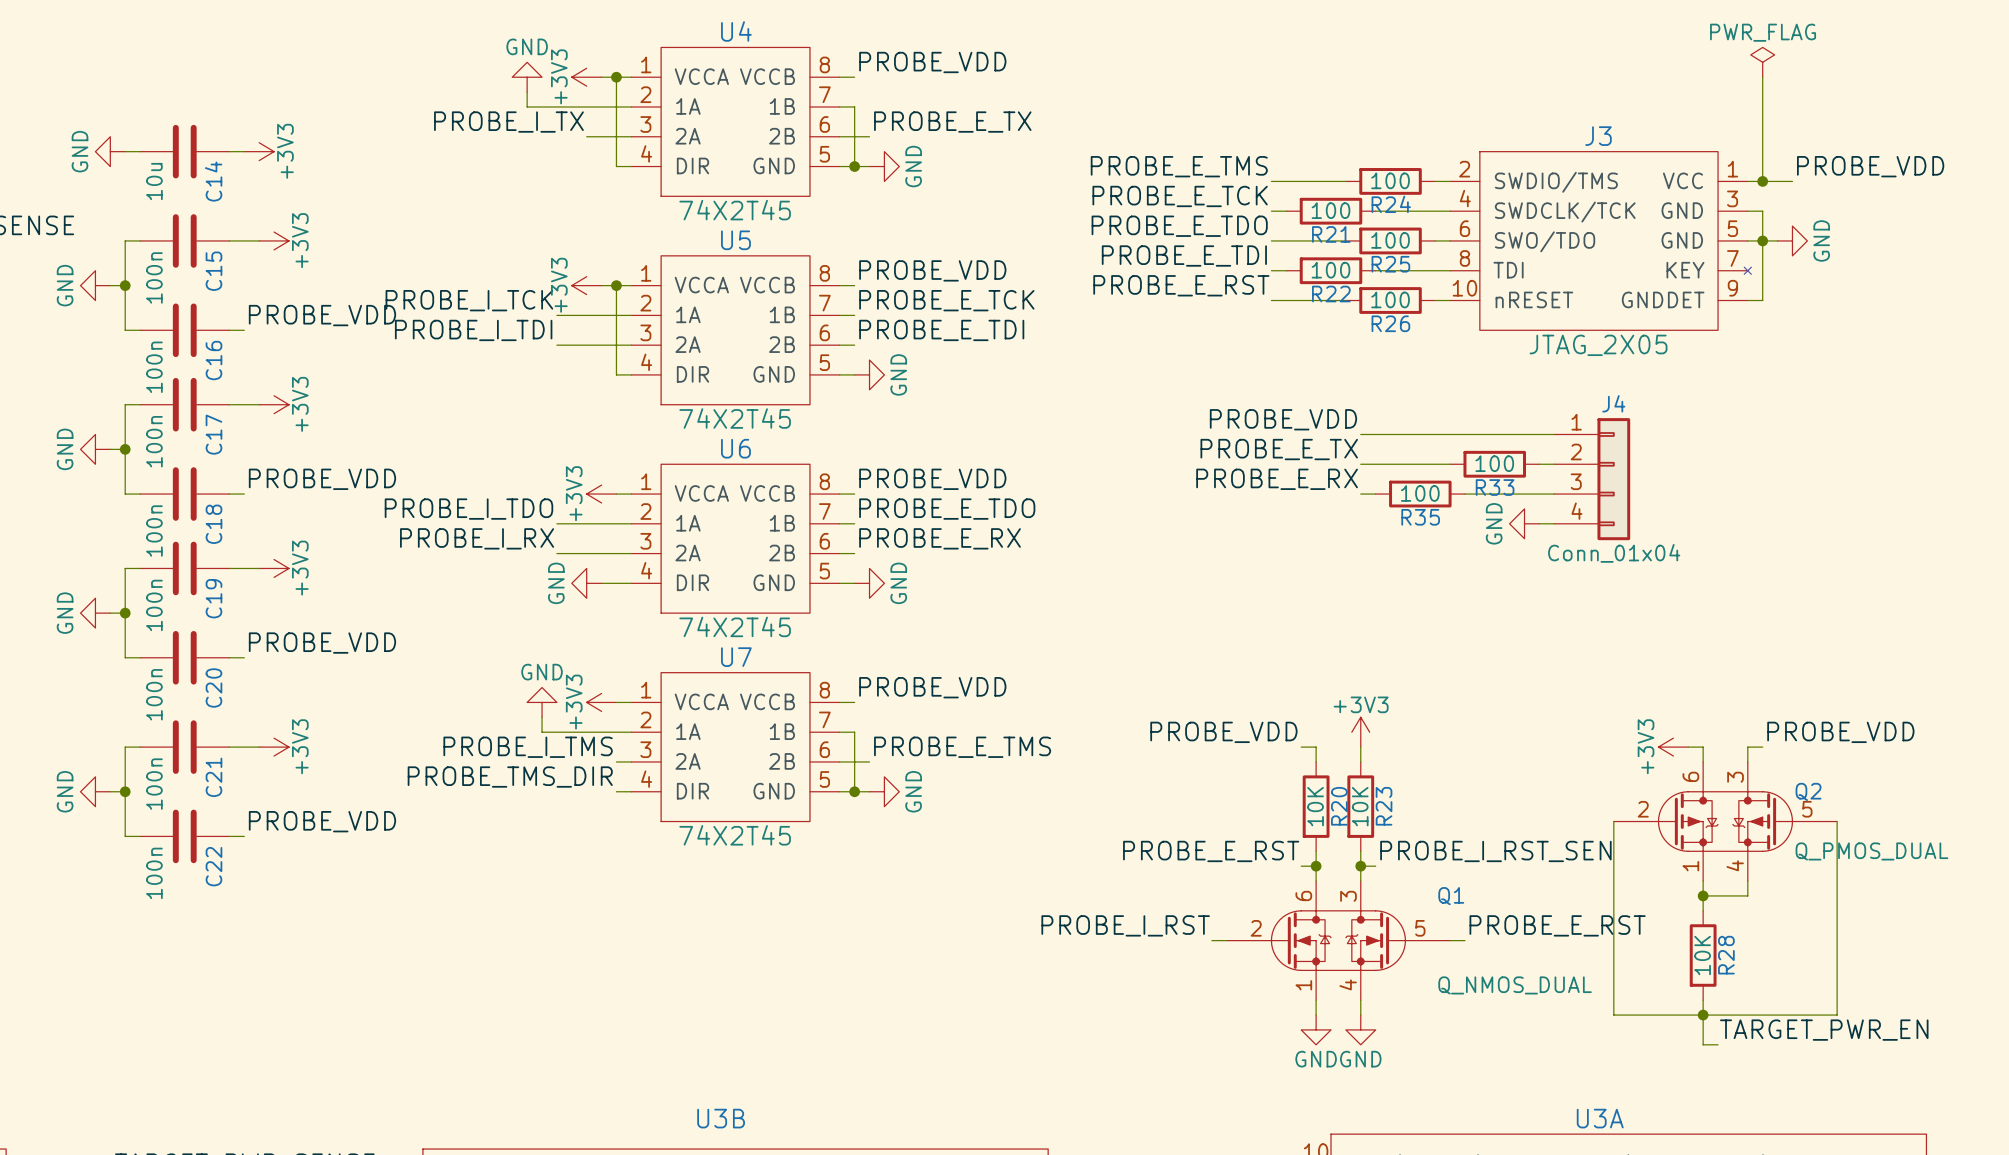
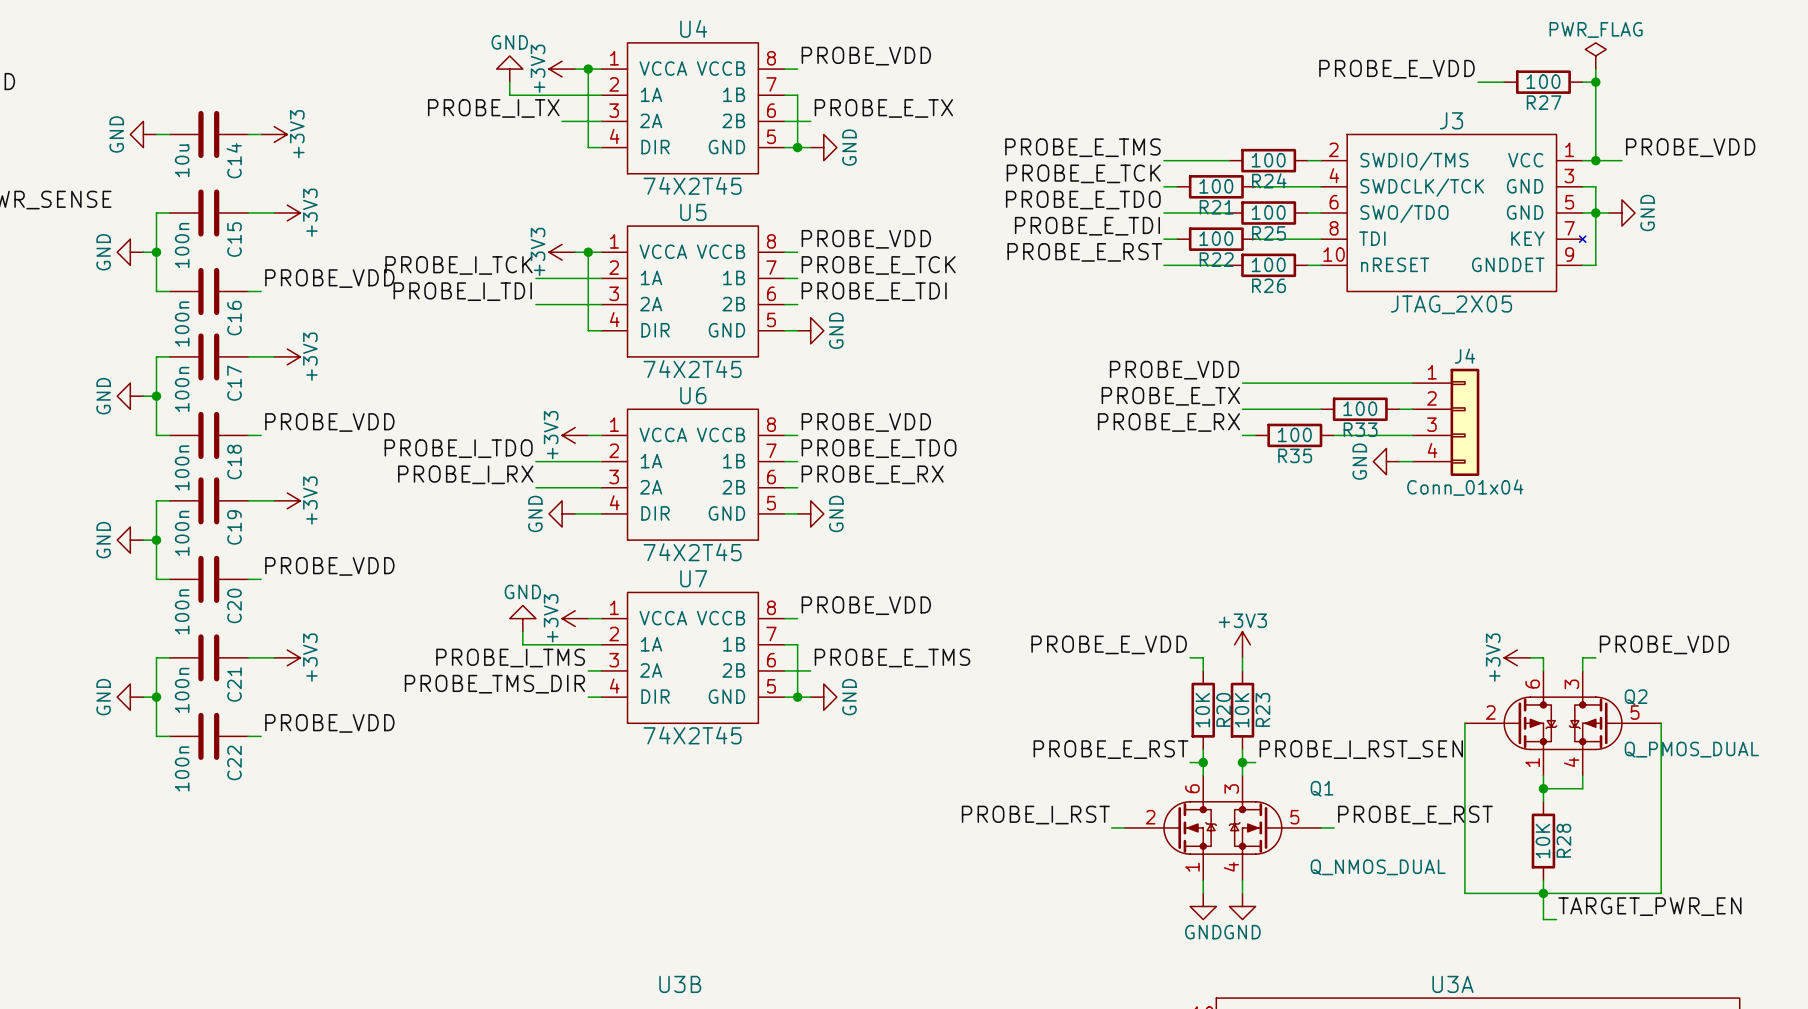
label: none -> PROBE_E_VDD (1396, 69)
wire: none -> (1478, 82) (1504, 82)
R27: none -> 100 (1543, 82)
wire: none -> (1582, 82) (1595, 82)
junction: none -> (1595, 82)
label: PROBE_VDD (1223, 732) -> PROBE_E_VDD (1109, 644)

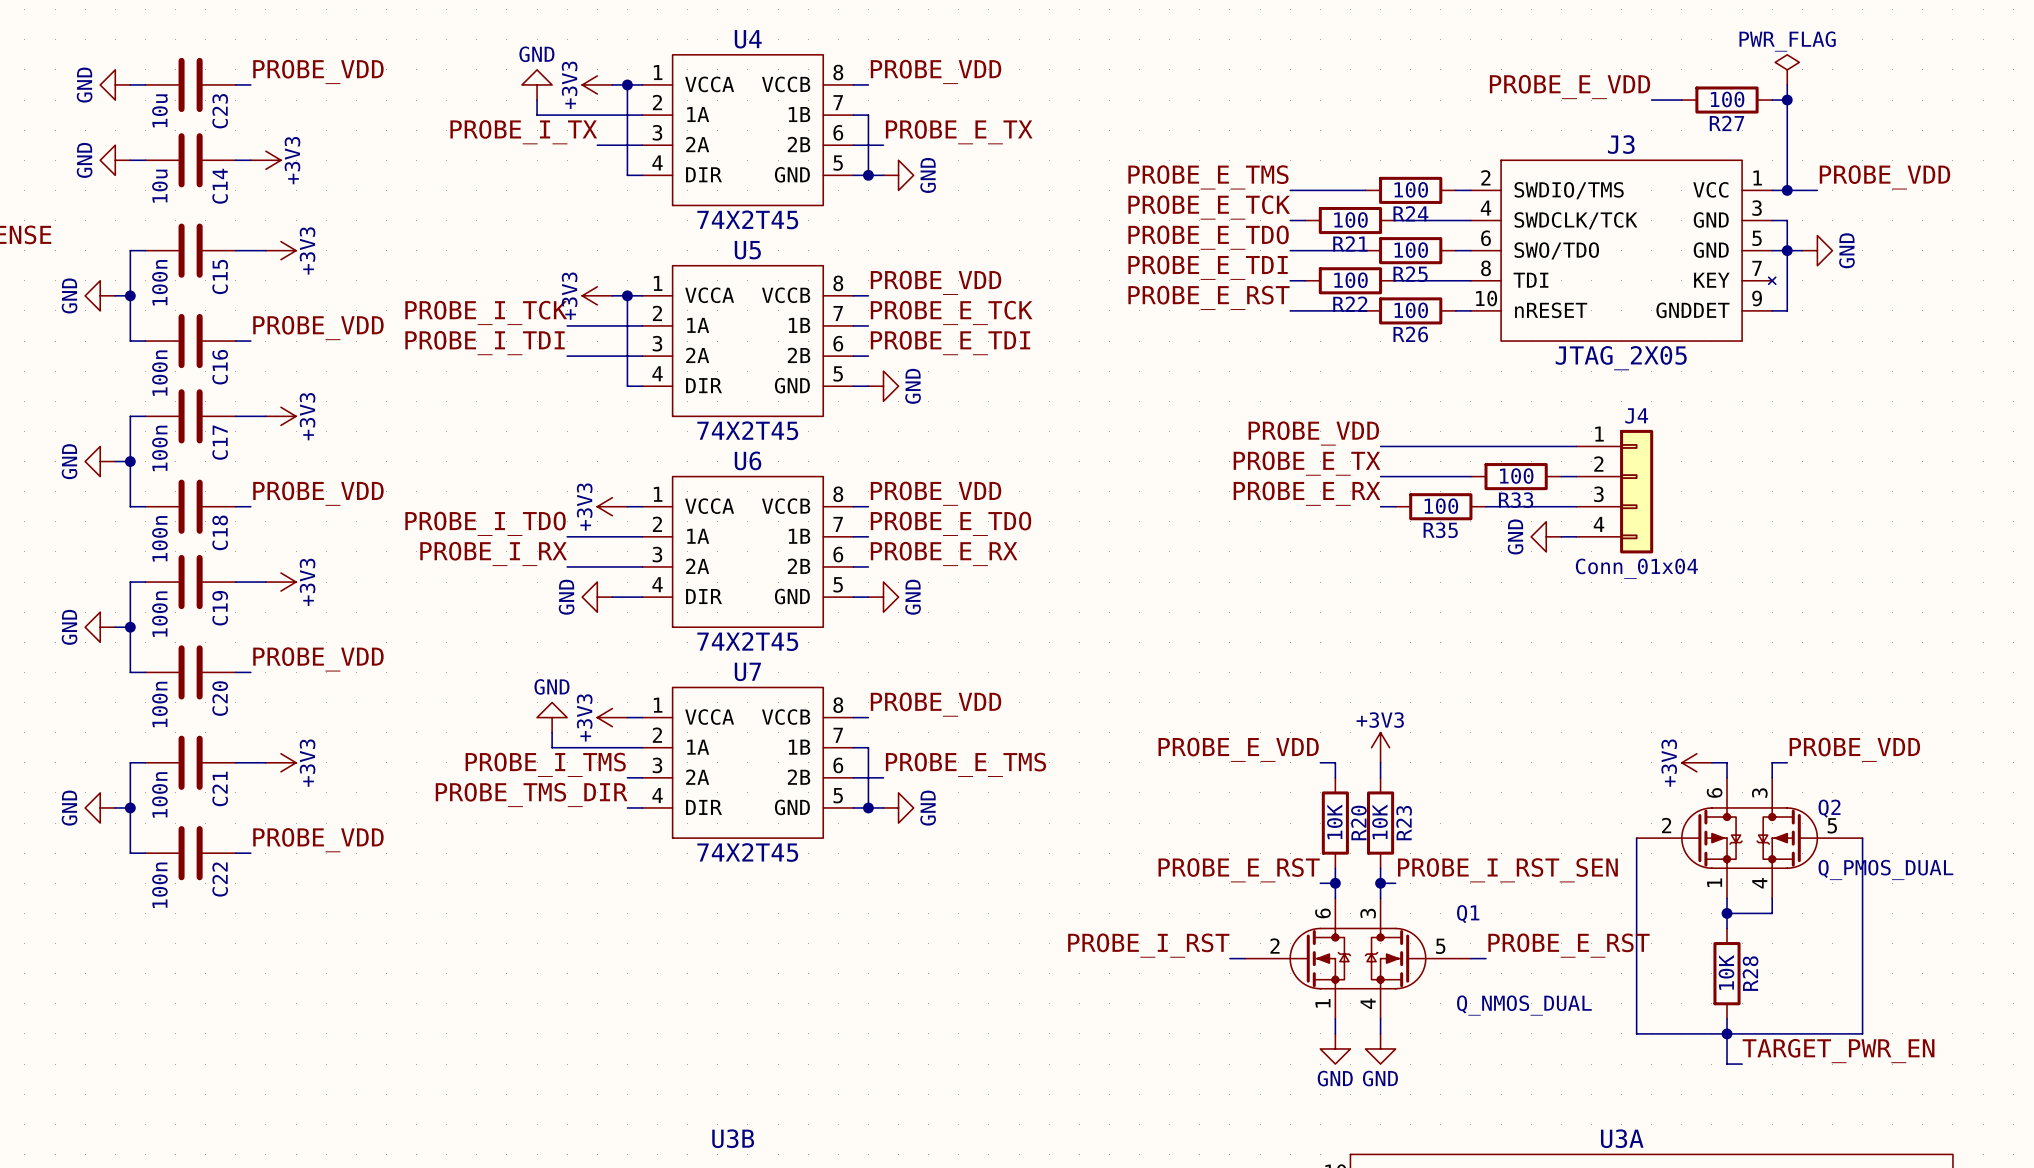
label: none -> PROBE_VDD (318, 71)
power symbol: none -> GND (115, 84)
wire: none -> (130, 84) (145, 84)
C23: none -> 10u (190, 84)
wire: none -> (235, 84) (250, 84)

